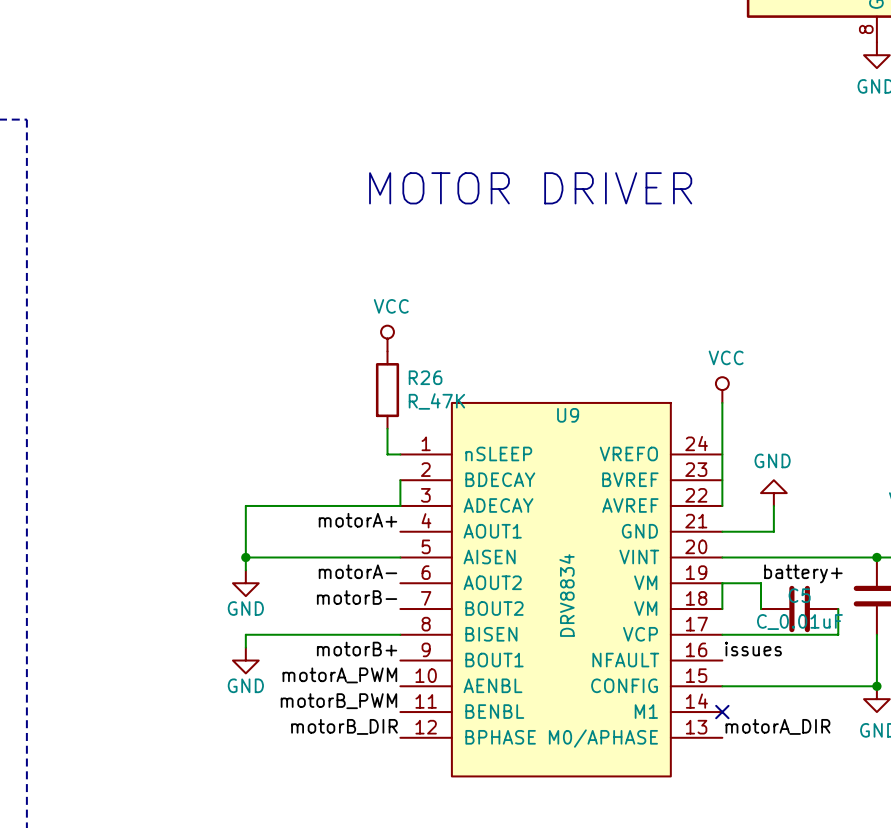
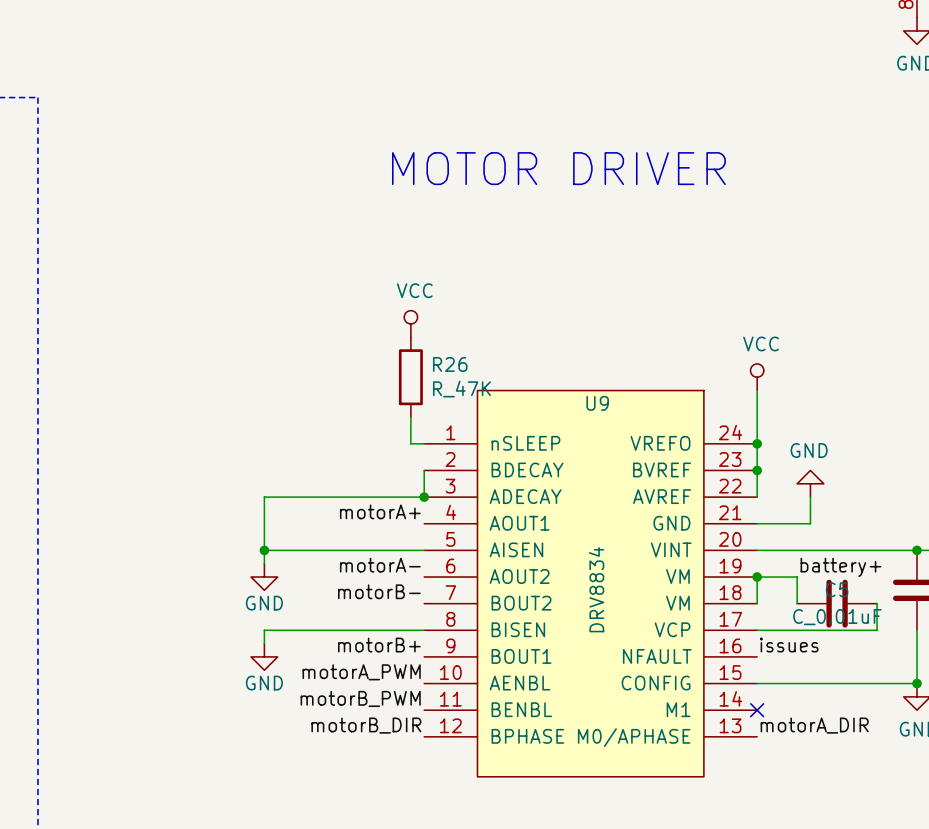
junction: none -> (757, 443)
junction: none -> (757, 470)
junction: none -> (424, 497)
junction: none -> (757, 577)

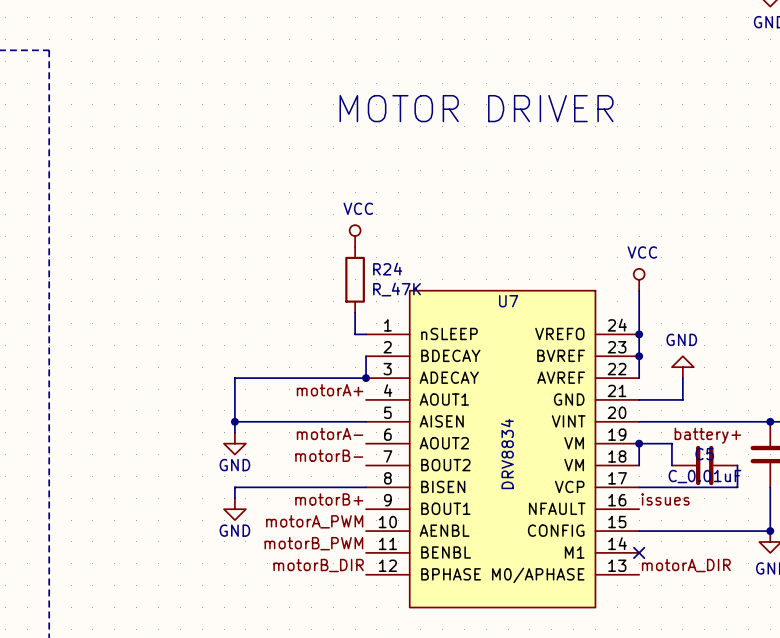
R26 name: R26 (450, 364) -> R24 (387, 269)
U9 name: U9 (597, 403) -> U7 (508, 301)

